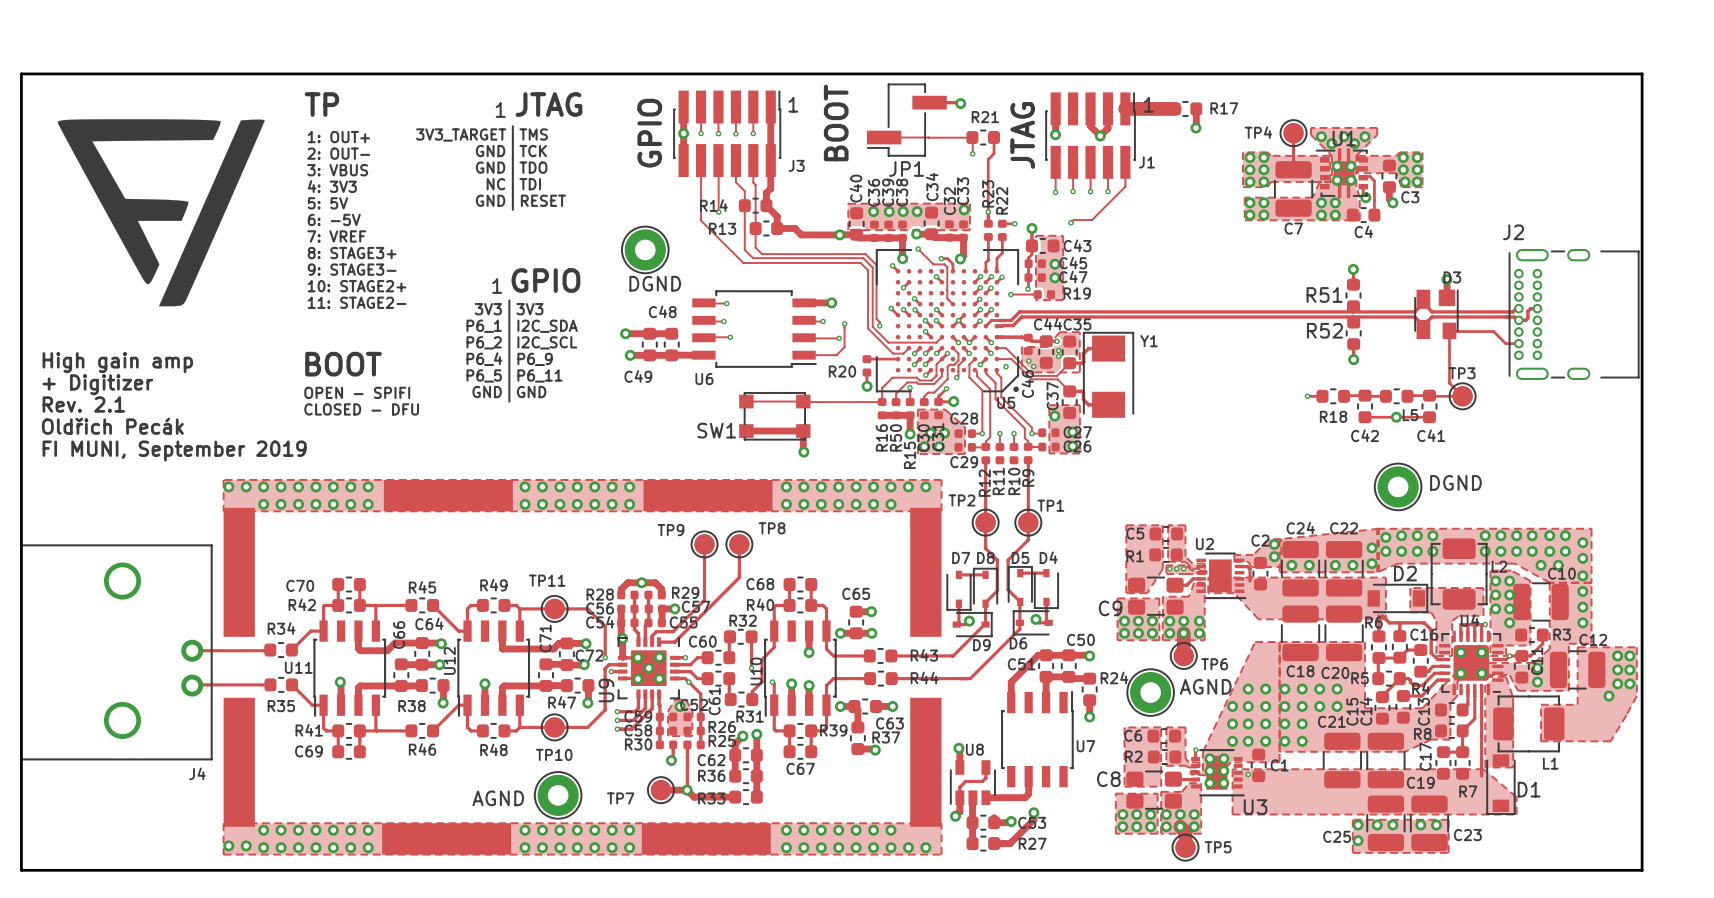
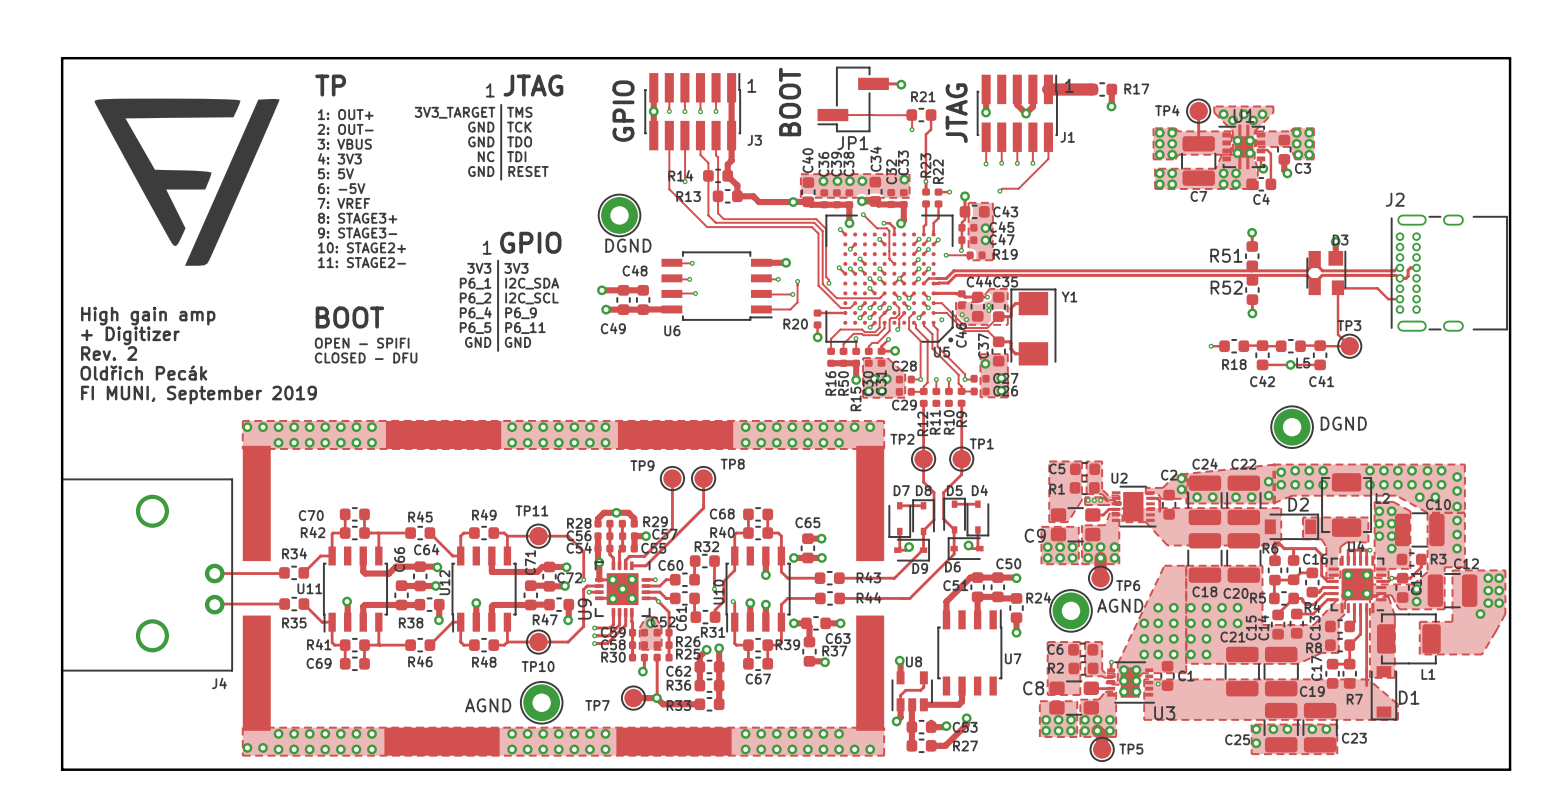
track: (746, 401) (882, 402) -> none
text: Rev. 2.1 (83, 404) -> Rev. 2 (109, 353)
SW1: (774, 416) -> none
track: (746, 431) (803, 431) (803, 452) -> none
via: (803, 452) -> none

